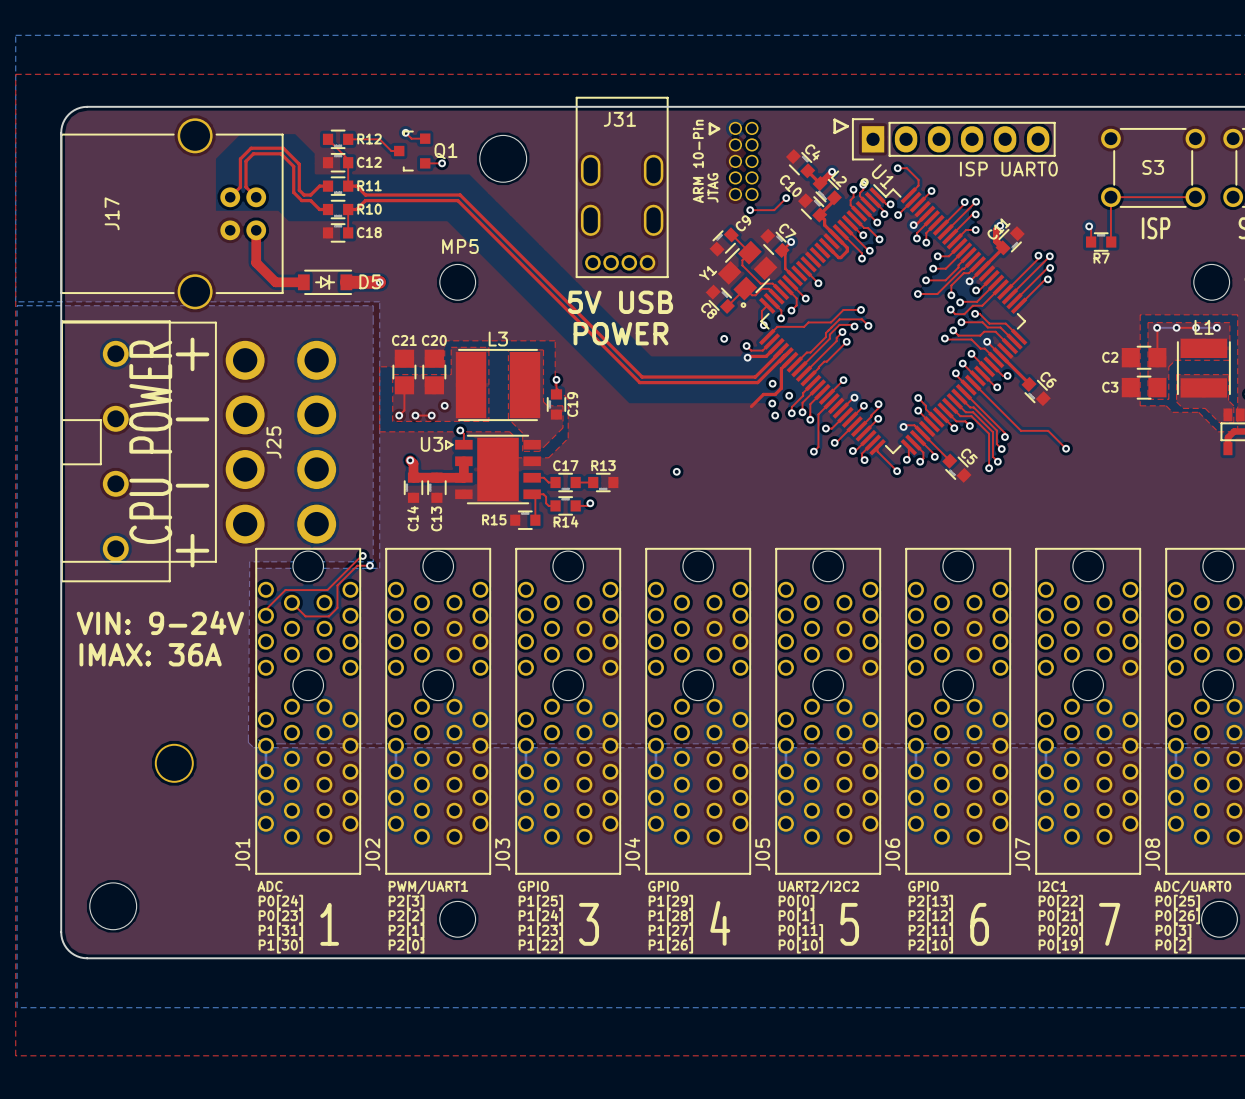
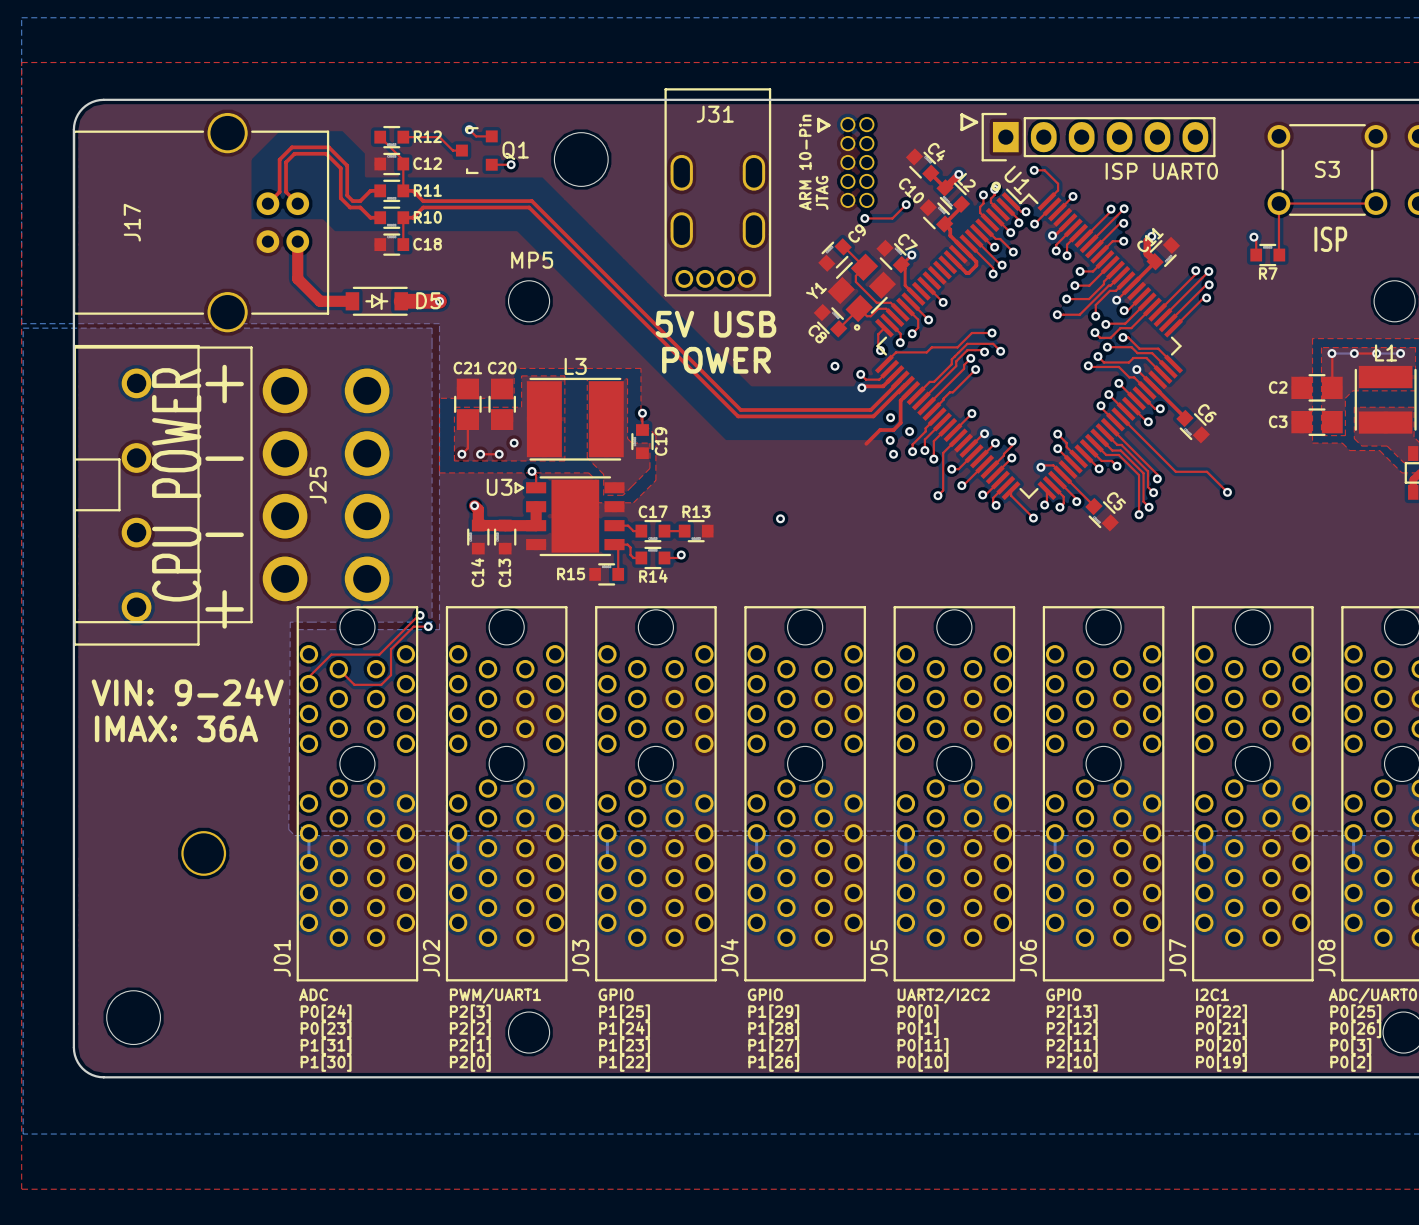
text: 4 (720, 923) -> none
text: 1 (329, 924) -> none
text: 3 (589, 924) -> none
text: 5 (849, 924) -> none
text: 6 (979, 924) -> none
text: 7 (1109, 924) -> none

